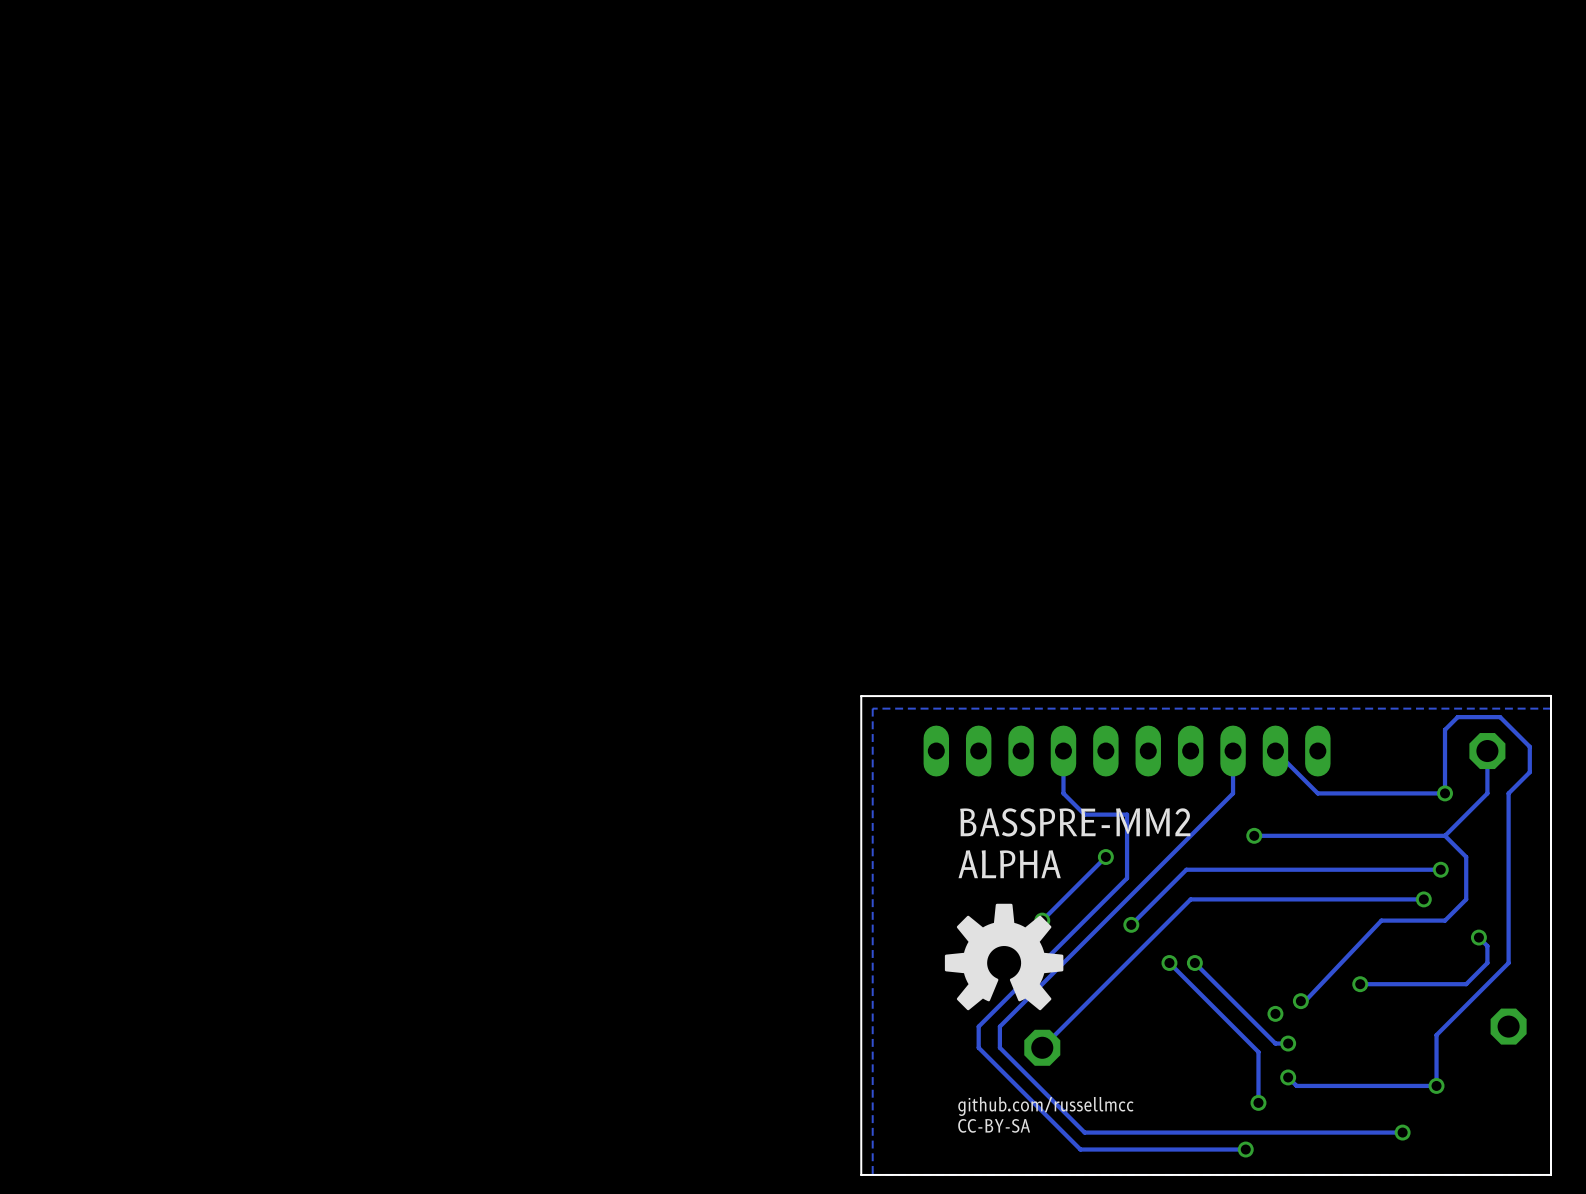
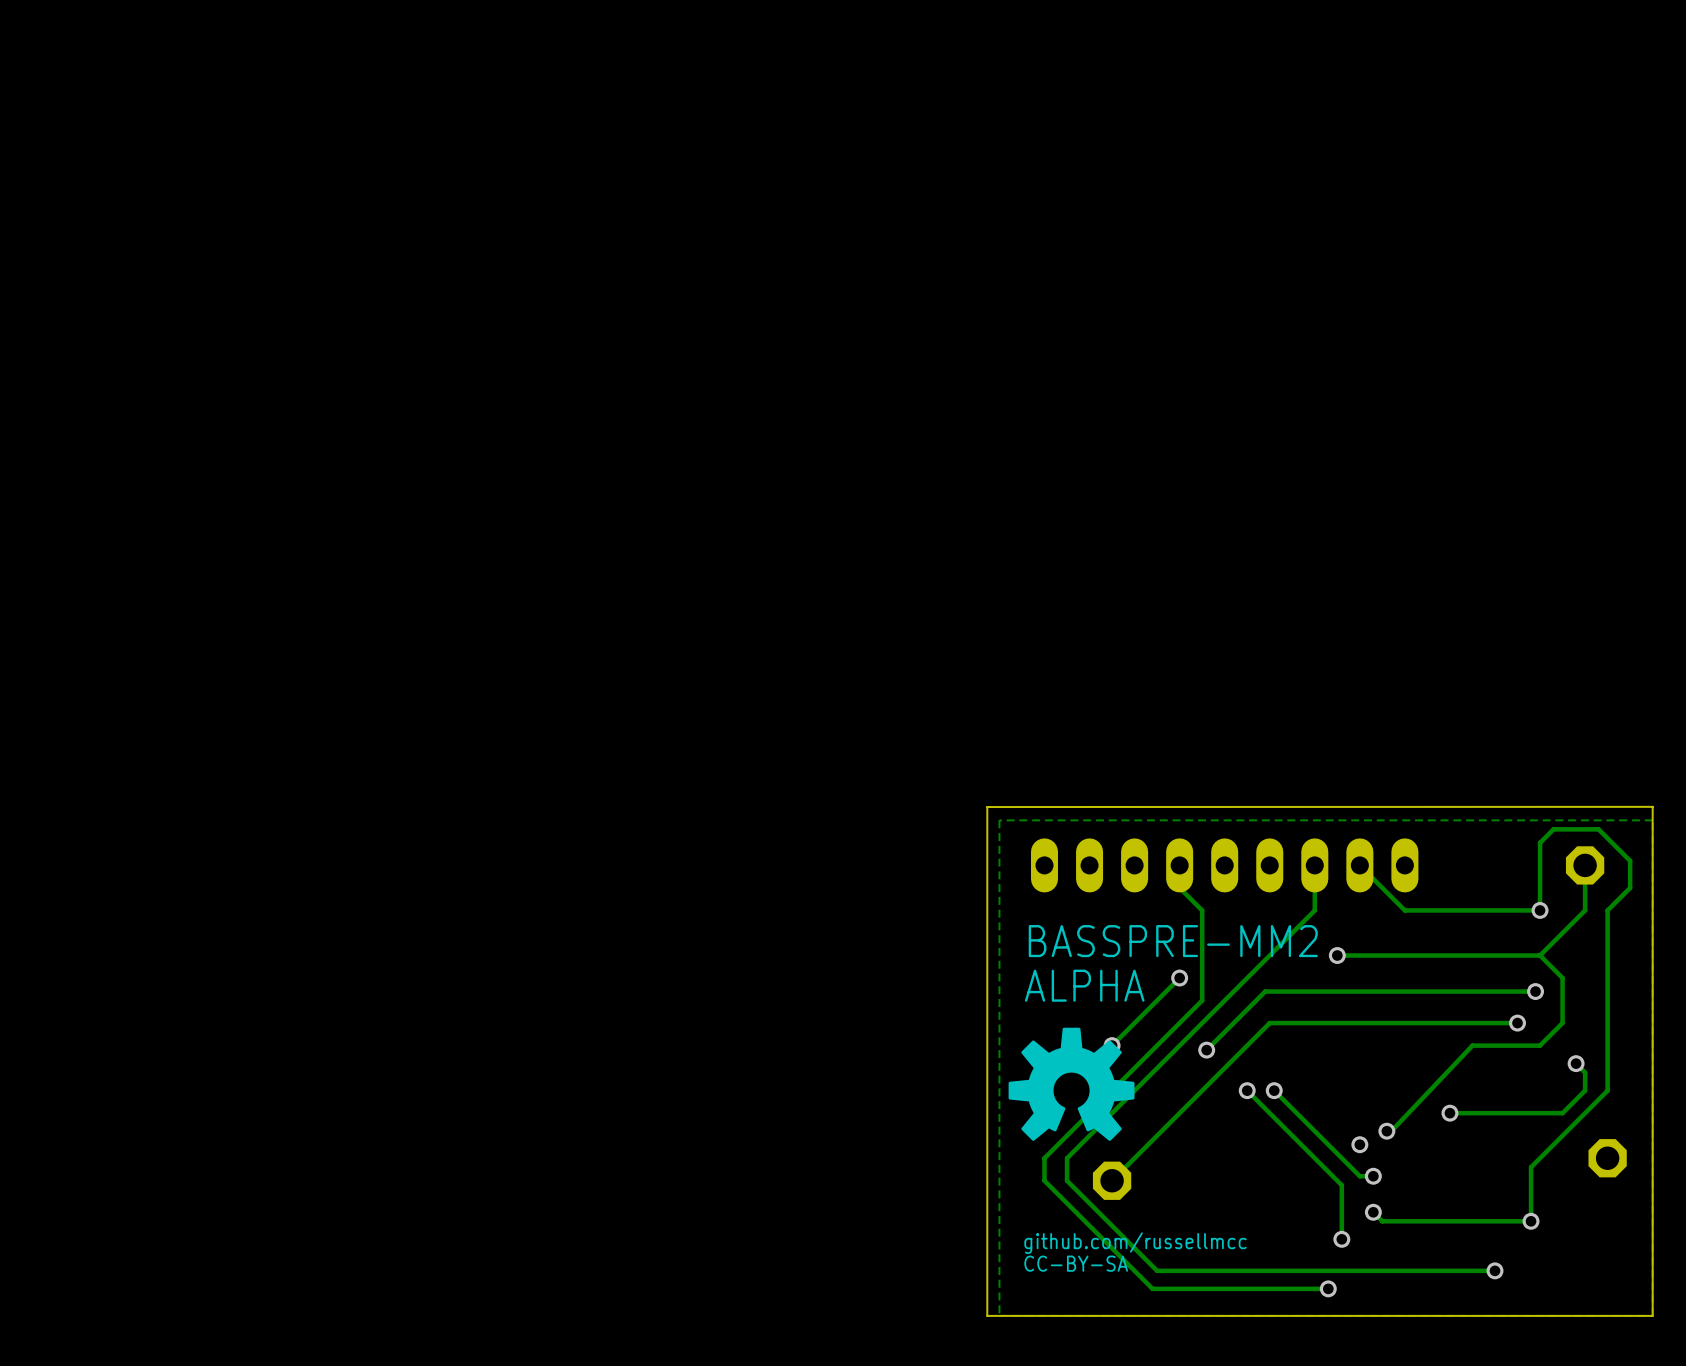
board edge: (924, 696) (861, 696) (861, 1174) (924, 1174) -> (987, 807) (987, 1315)
zone outline: (936, 708) (872, 708) (872, 1174) (936, 1174) -> (999, 820) (999, 1315)
track: (1063, 751) (1063, 793) (1084, 814) (1127, 814) -> (1179, 865) (1179, 887) (1202, 910) (1202, 932)
part: (1127, 751) -> none
part: none -> (1224, 865)

